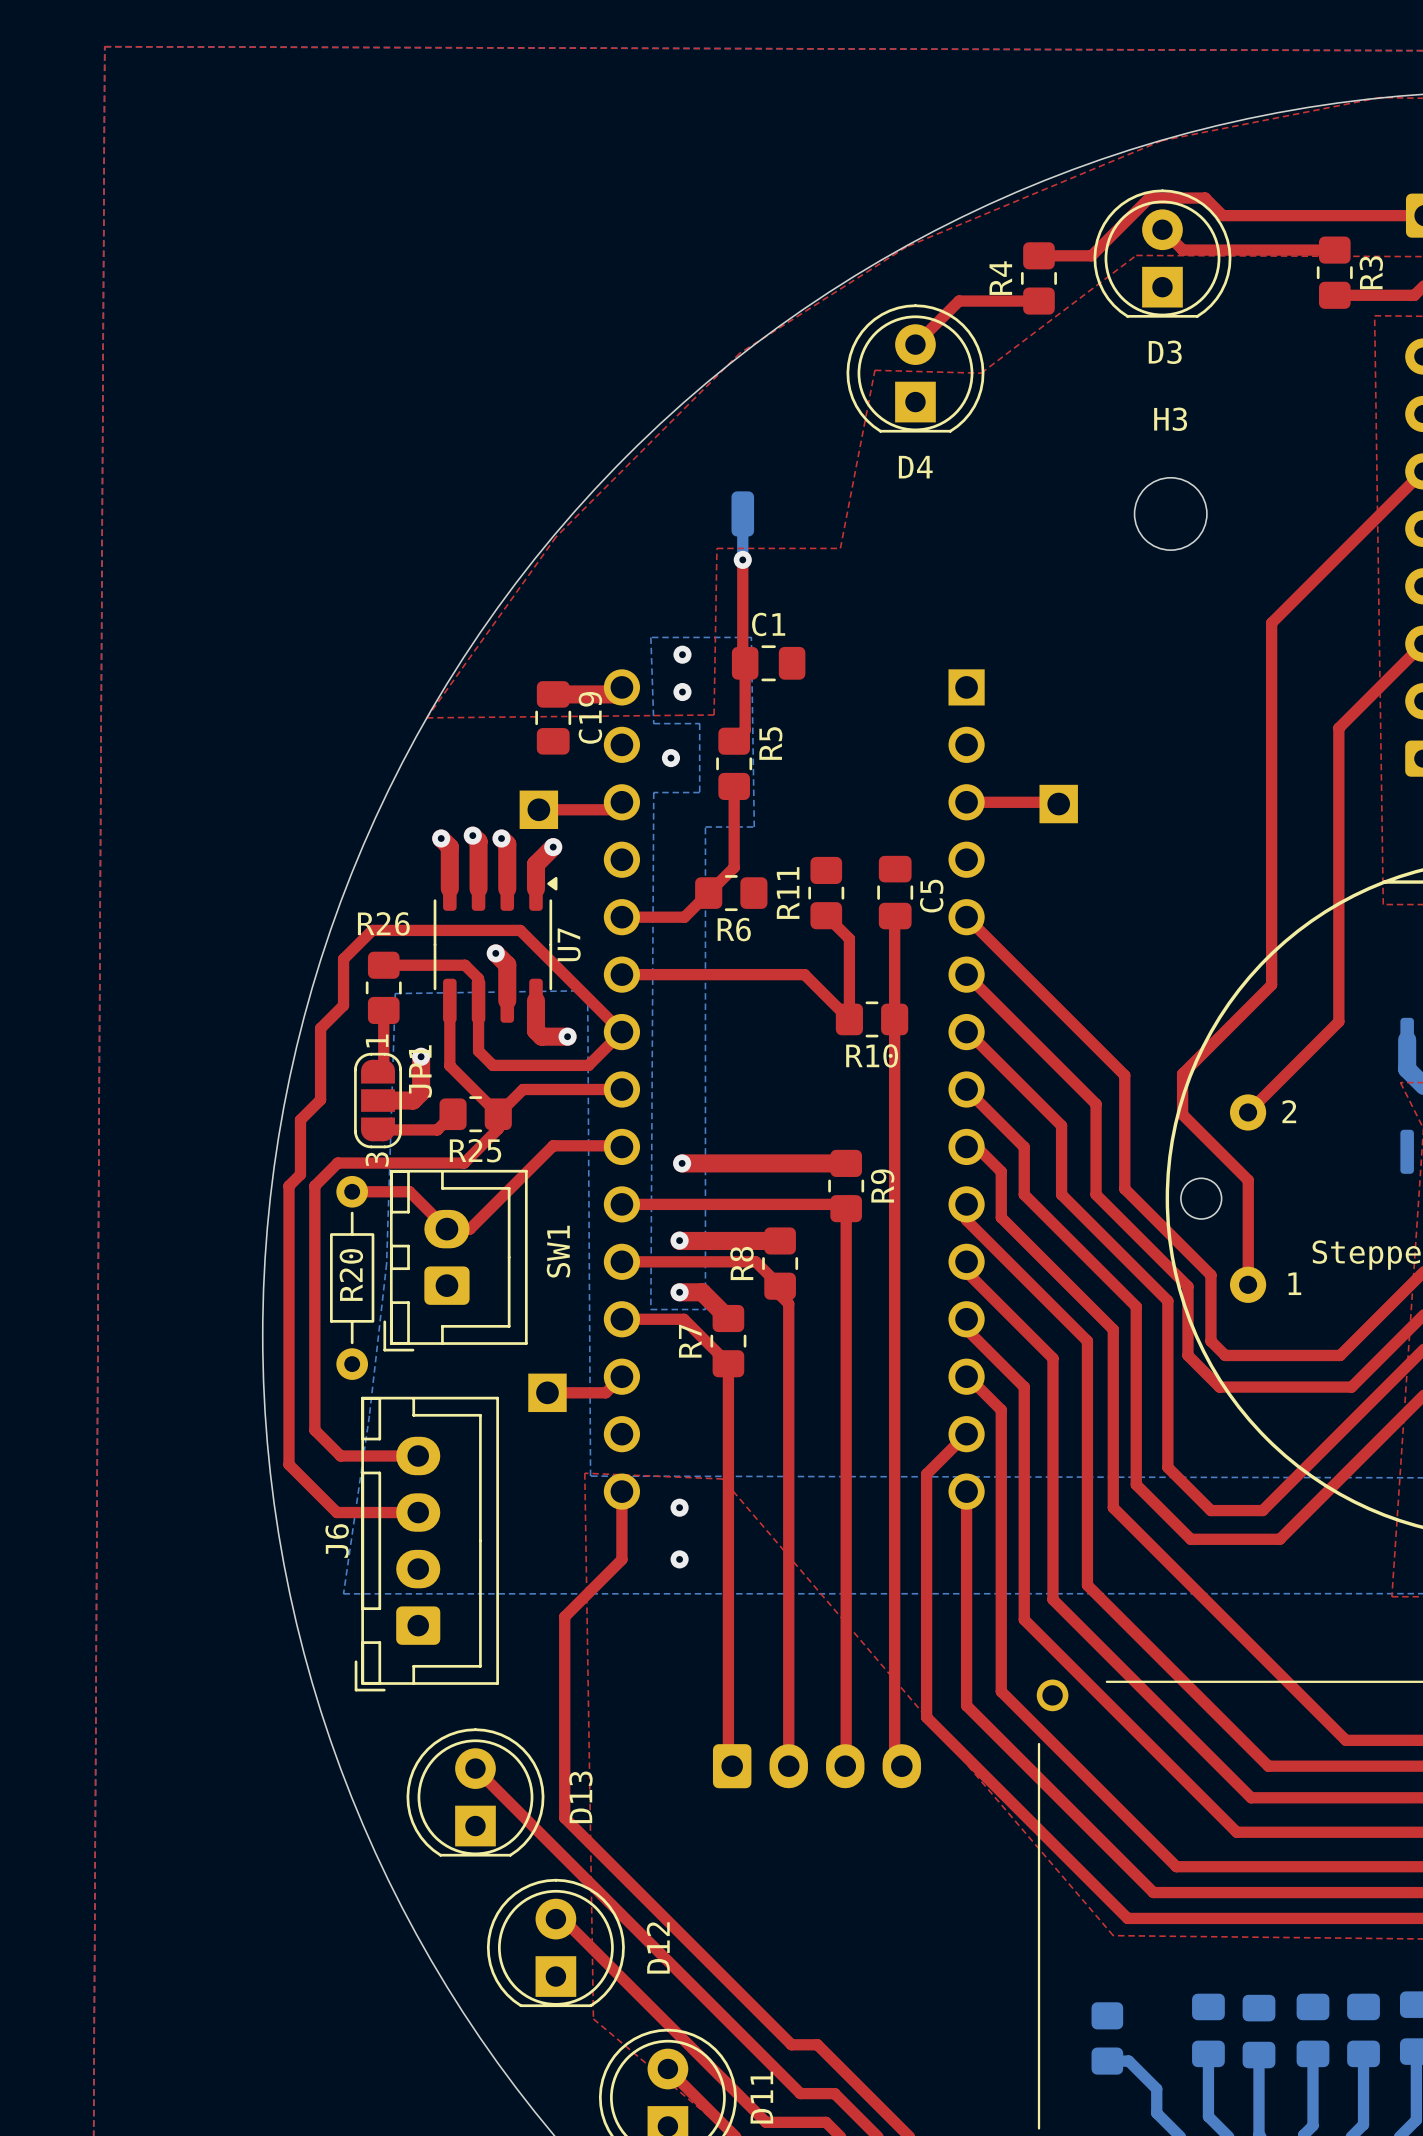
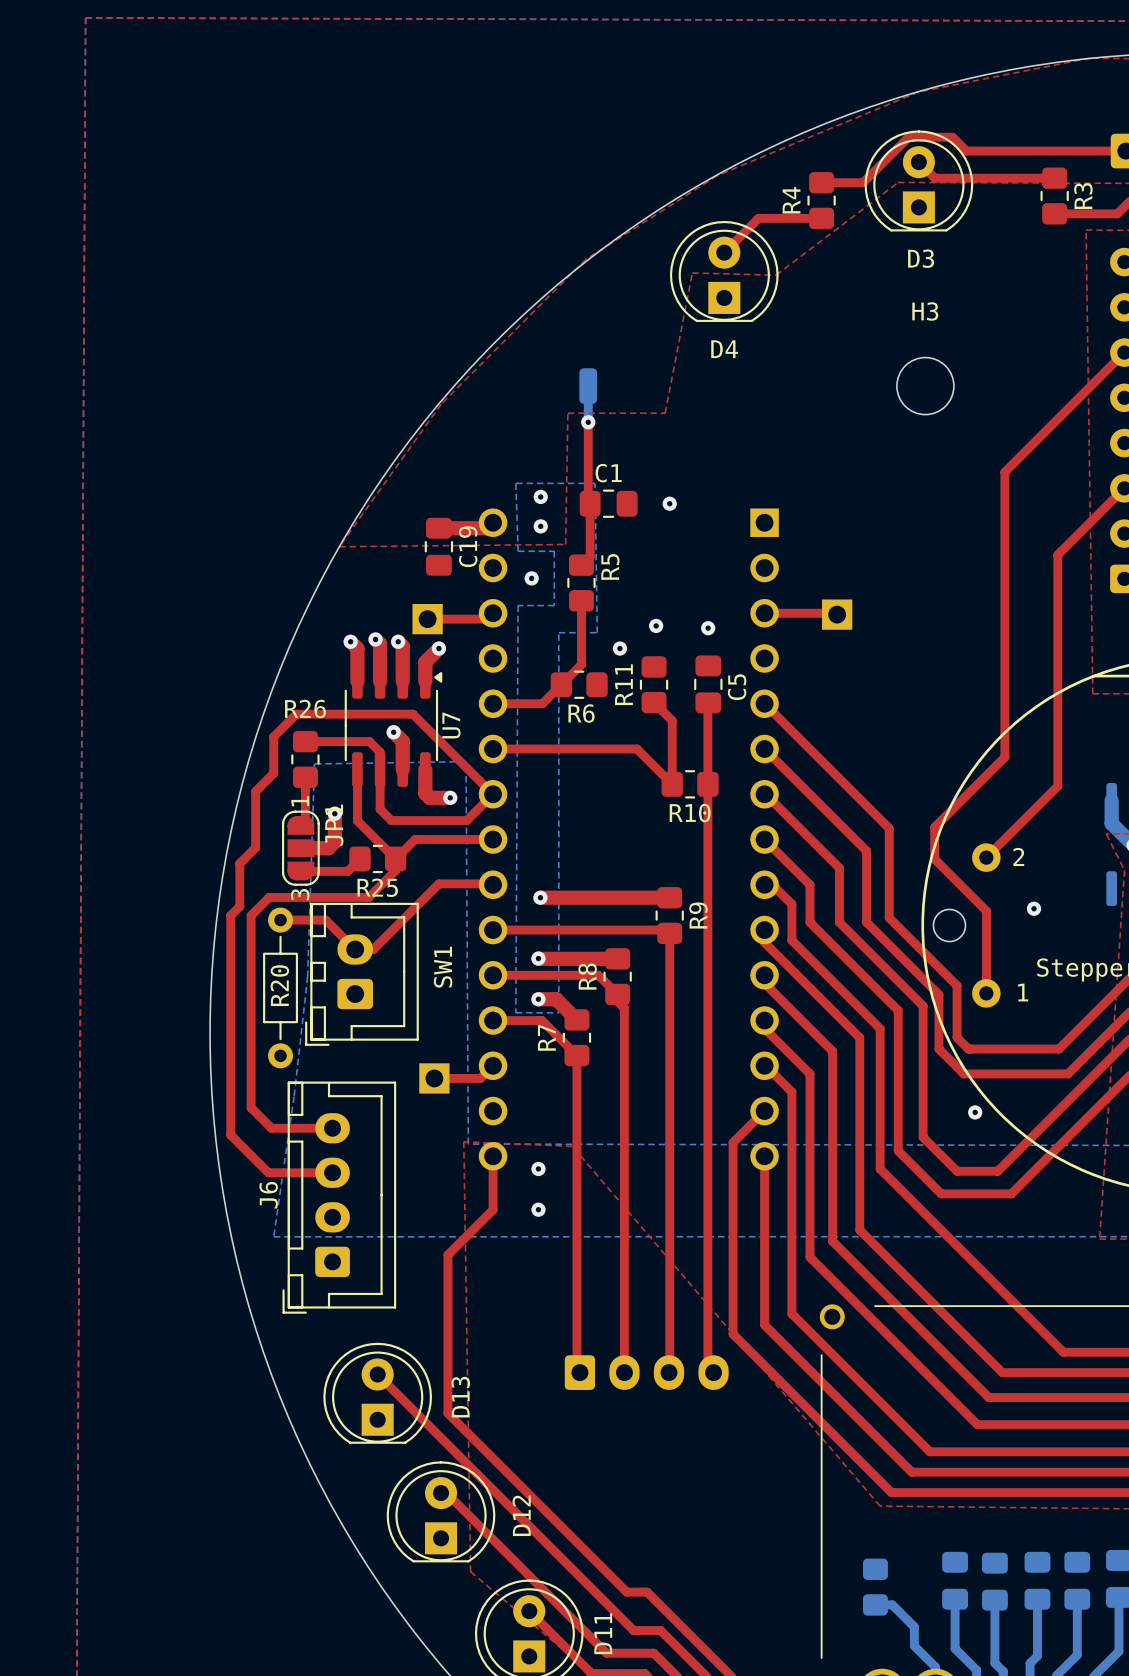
via: none -> (669, 503)
via: none -> (656, 625)
via: none -> (708, 628)
via: none -> (619, 648)
via: none -> (1034, 908)
via: none -> (975, 1112)

